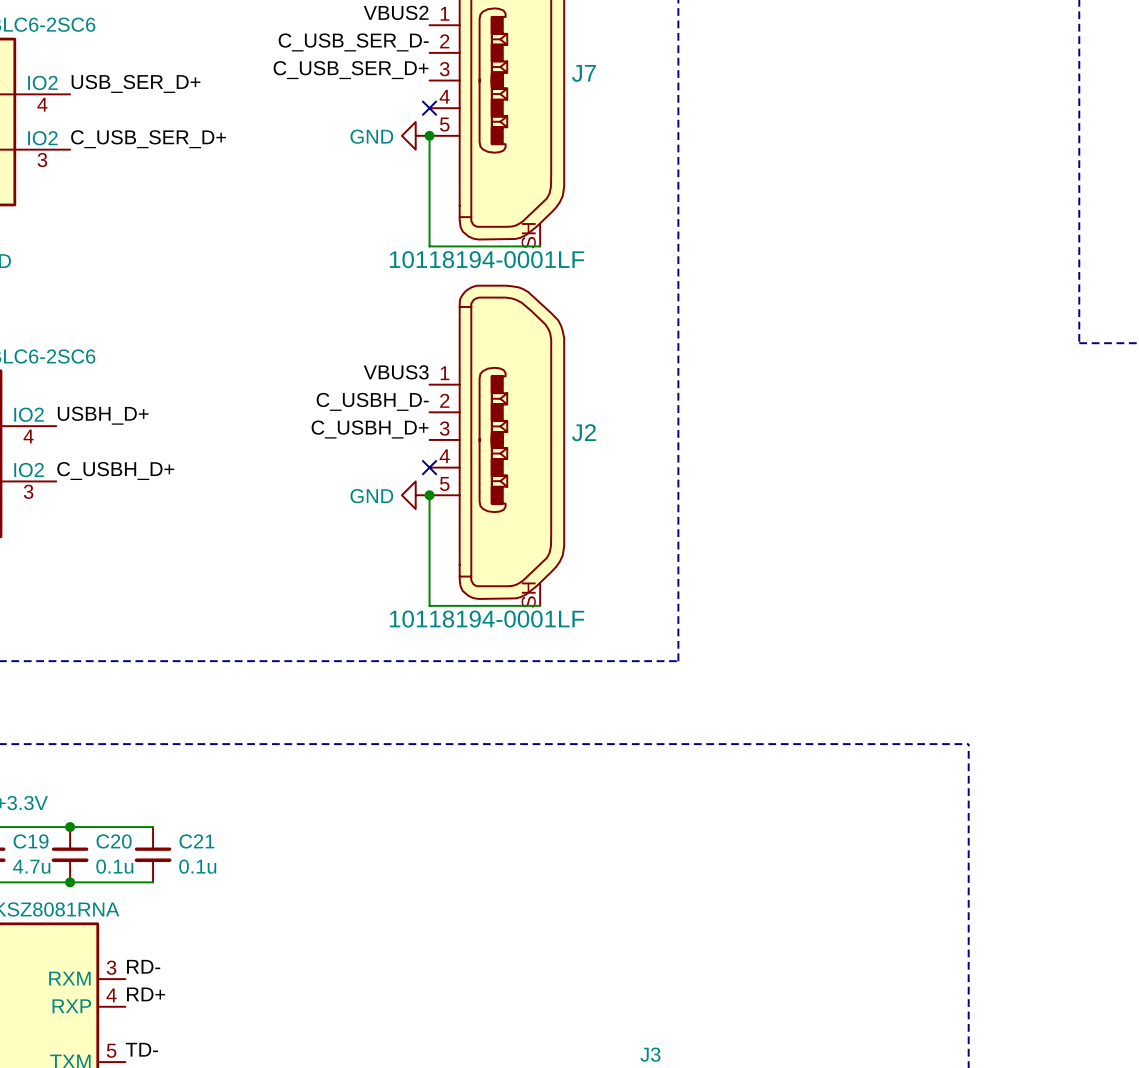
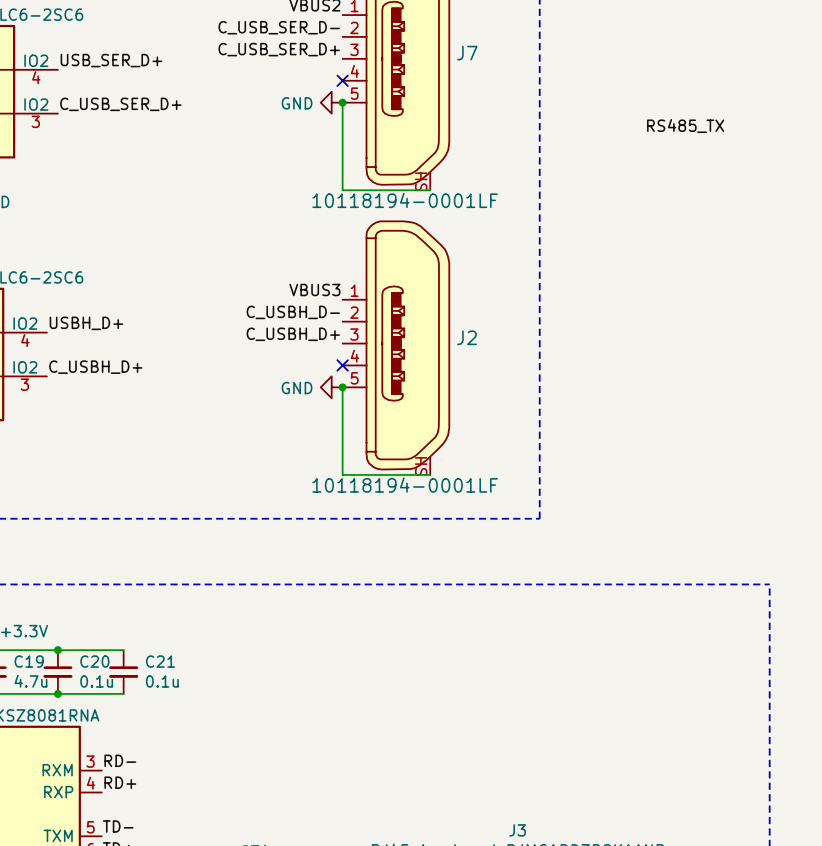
label: none -> RS485_TX (685, 125)

